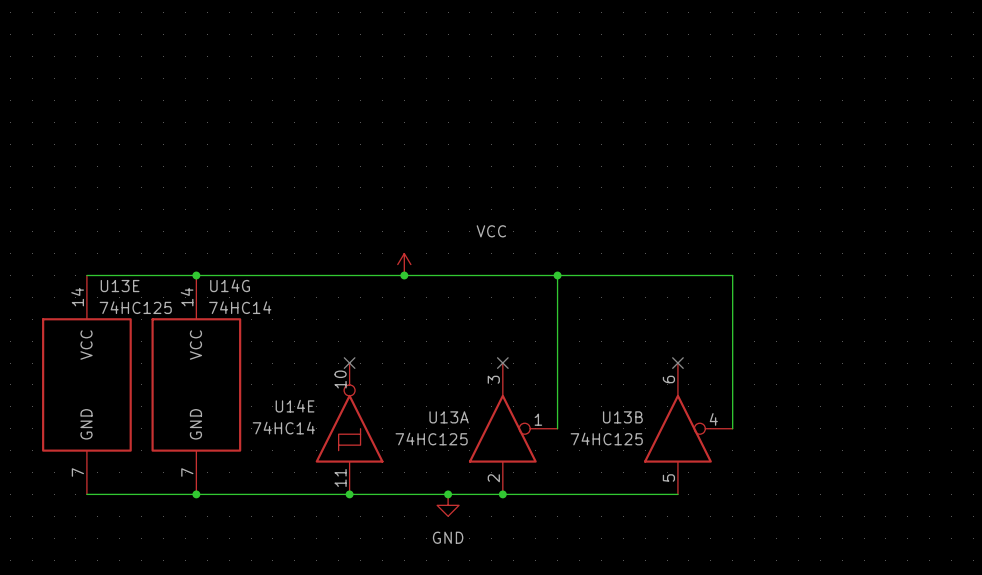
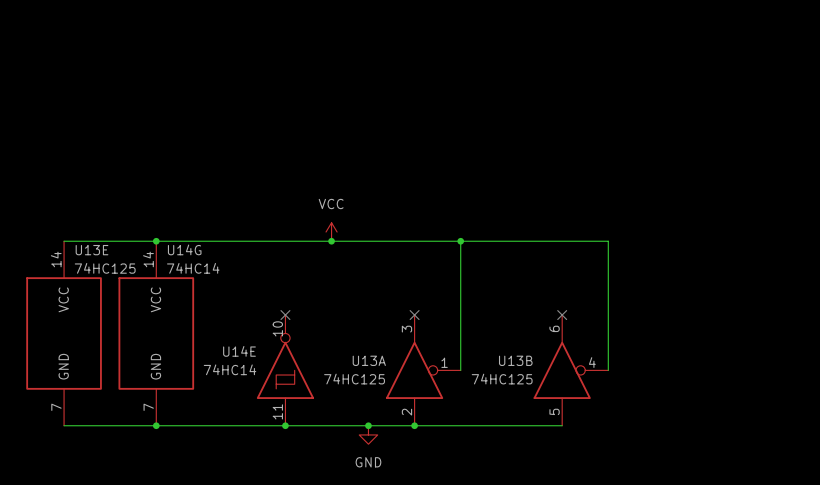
power symbol text position: VCC (491, 231) -> VCC (331, 204)

